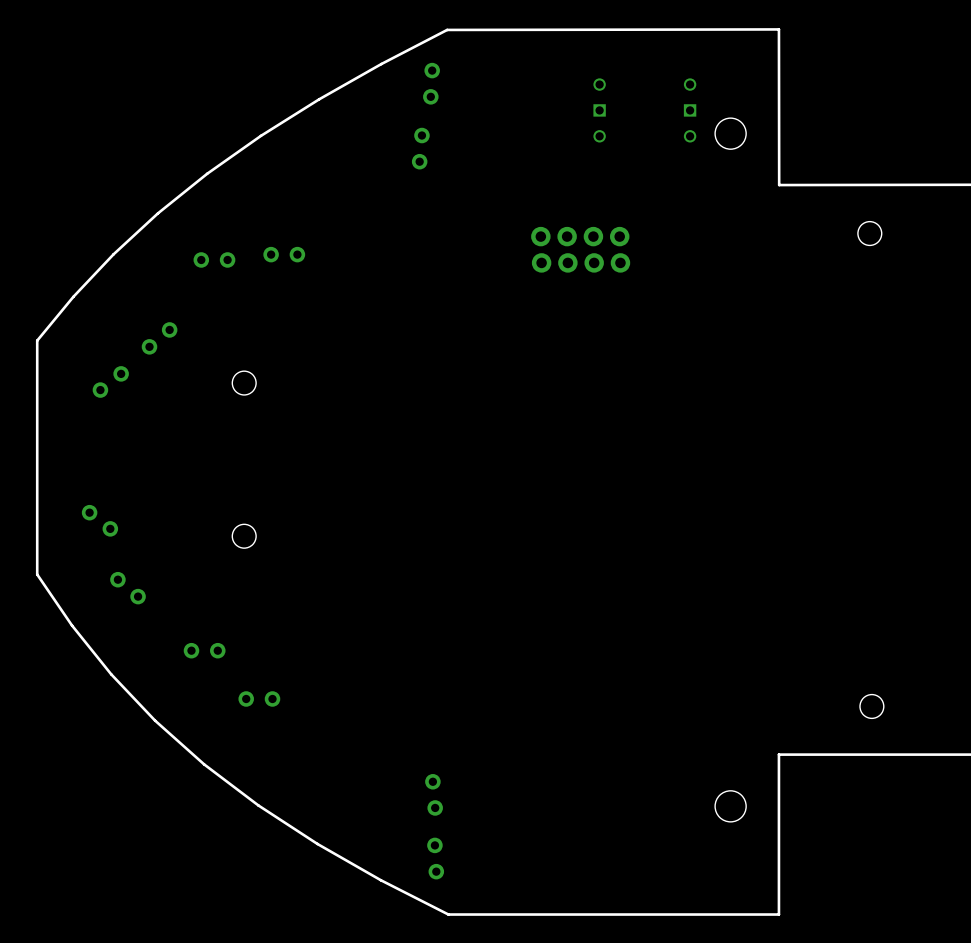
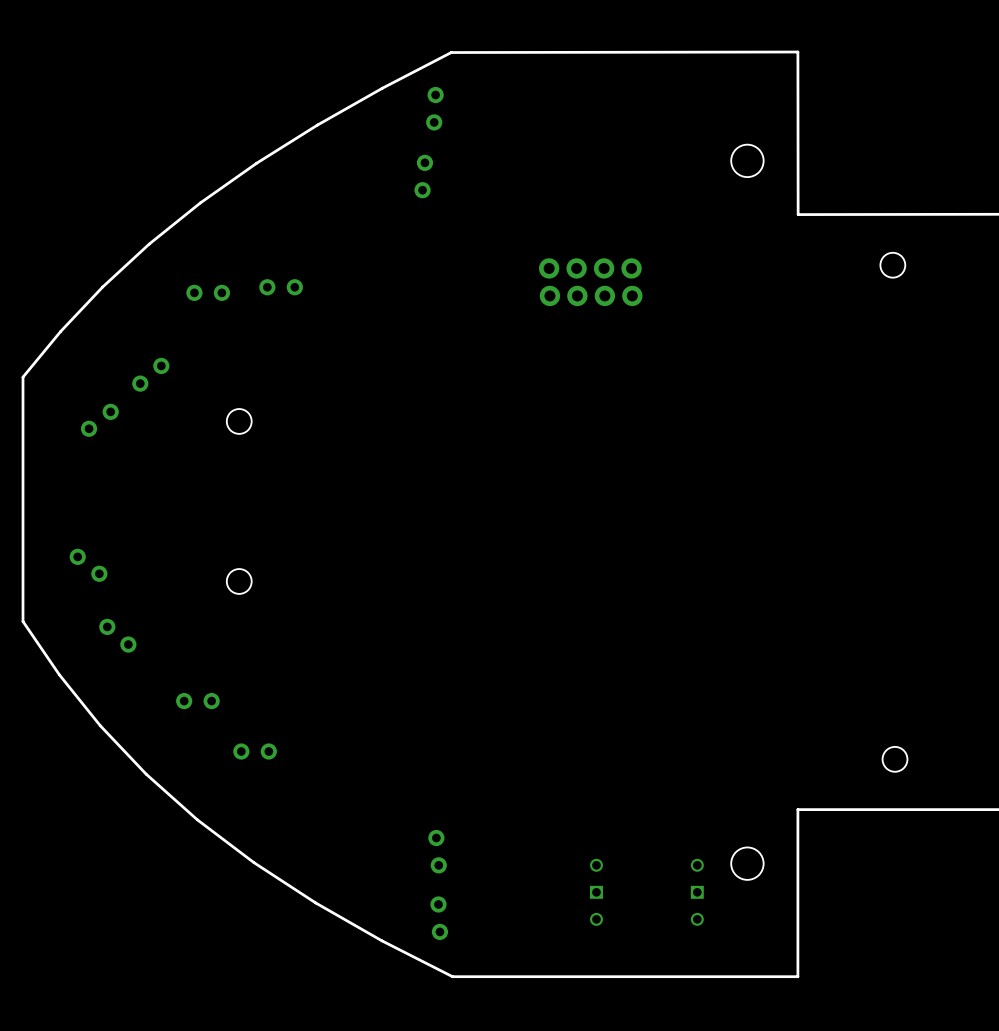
part: (599, 110) -> none
part: (690, 110) -> none
part: none -> (596, 892)
part: none -> (697, 892)

